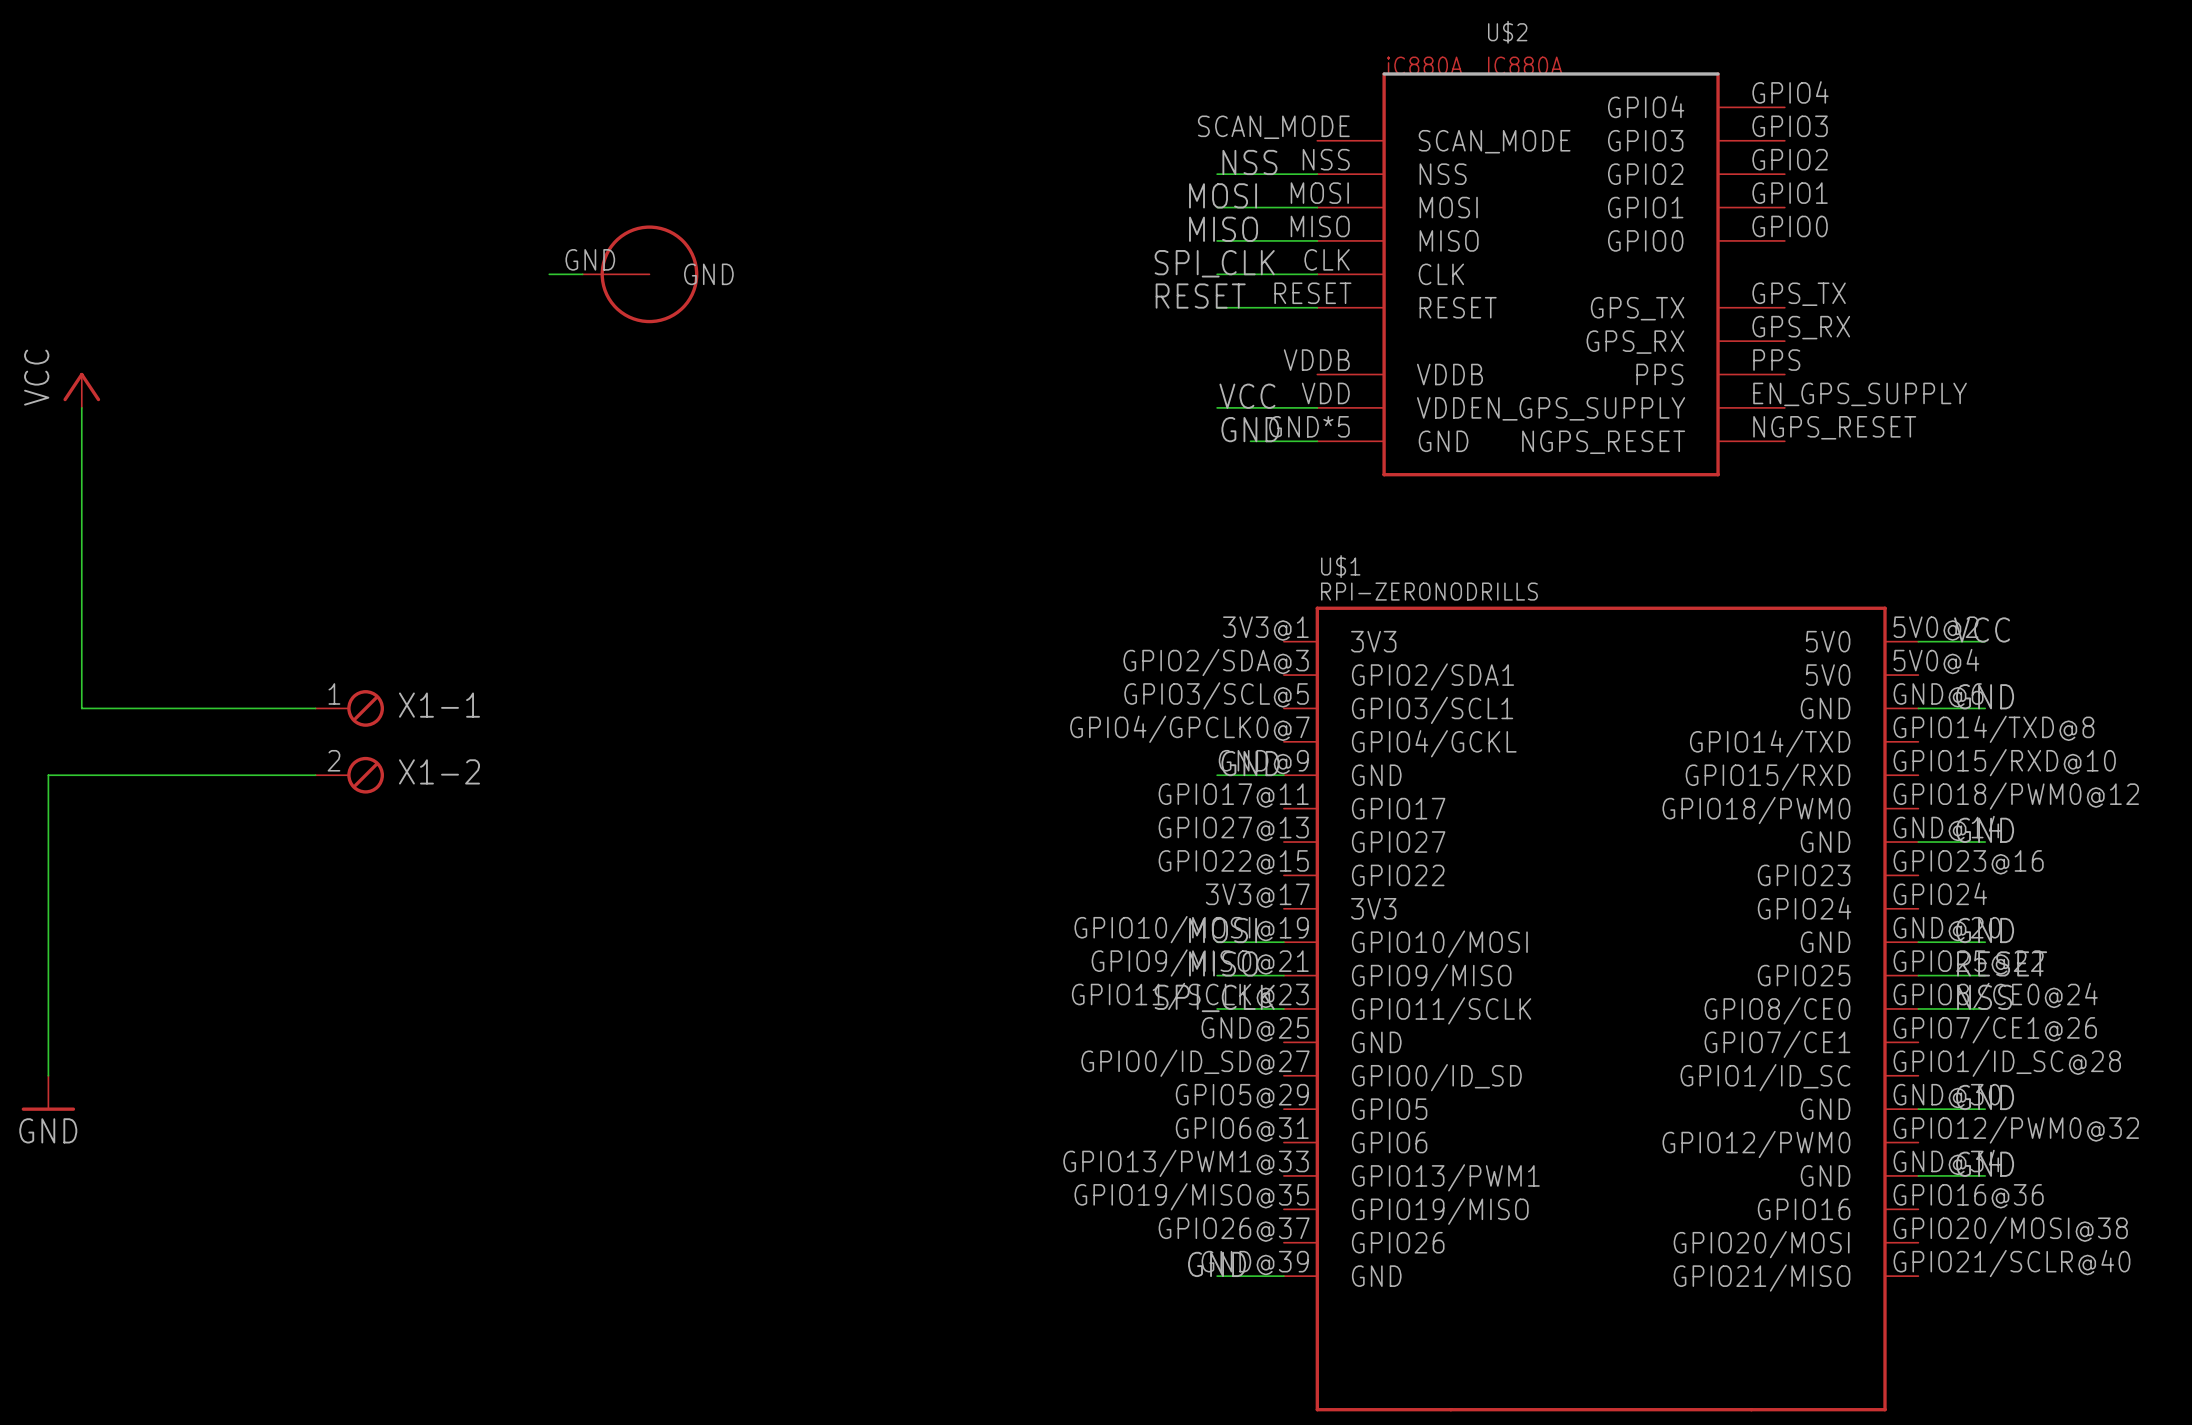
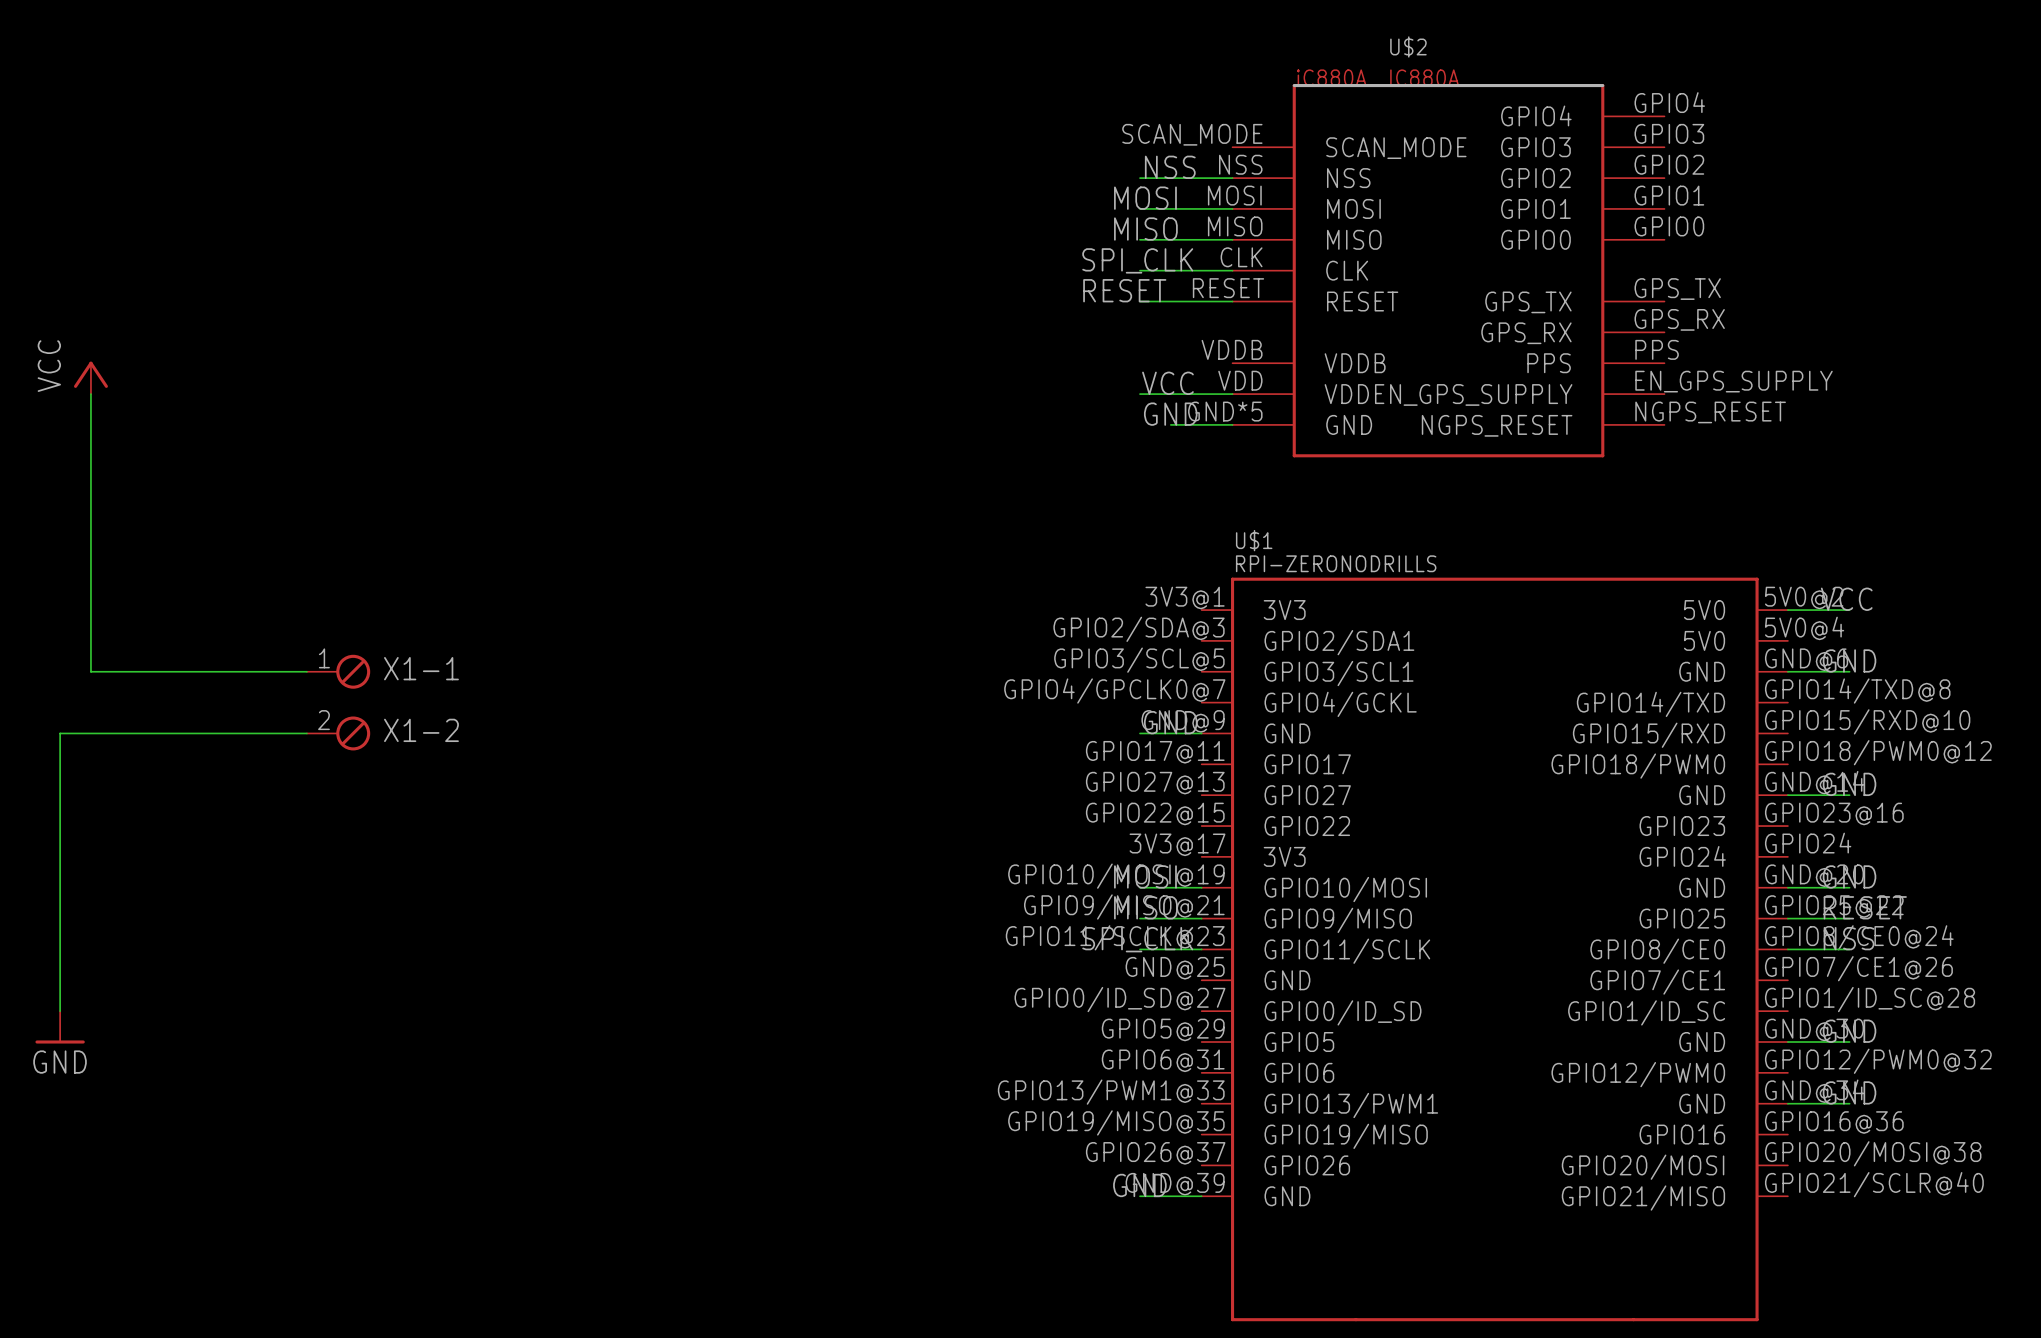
wire: (549, 274) (582, 274) -> none
part: (640, 274) -> none

